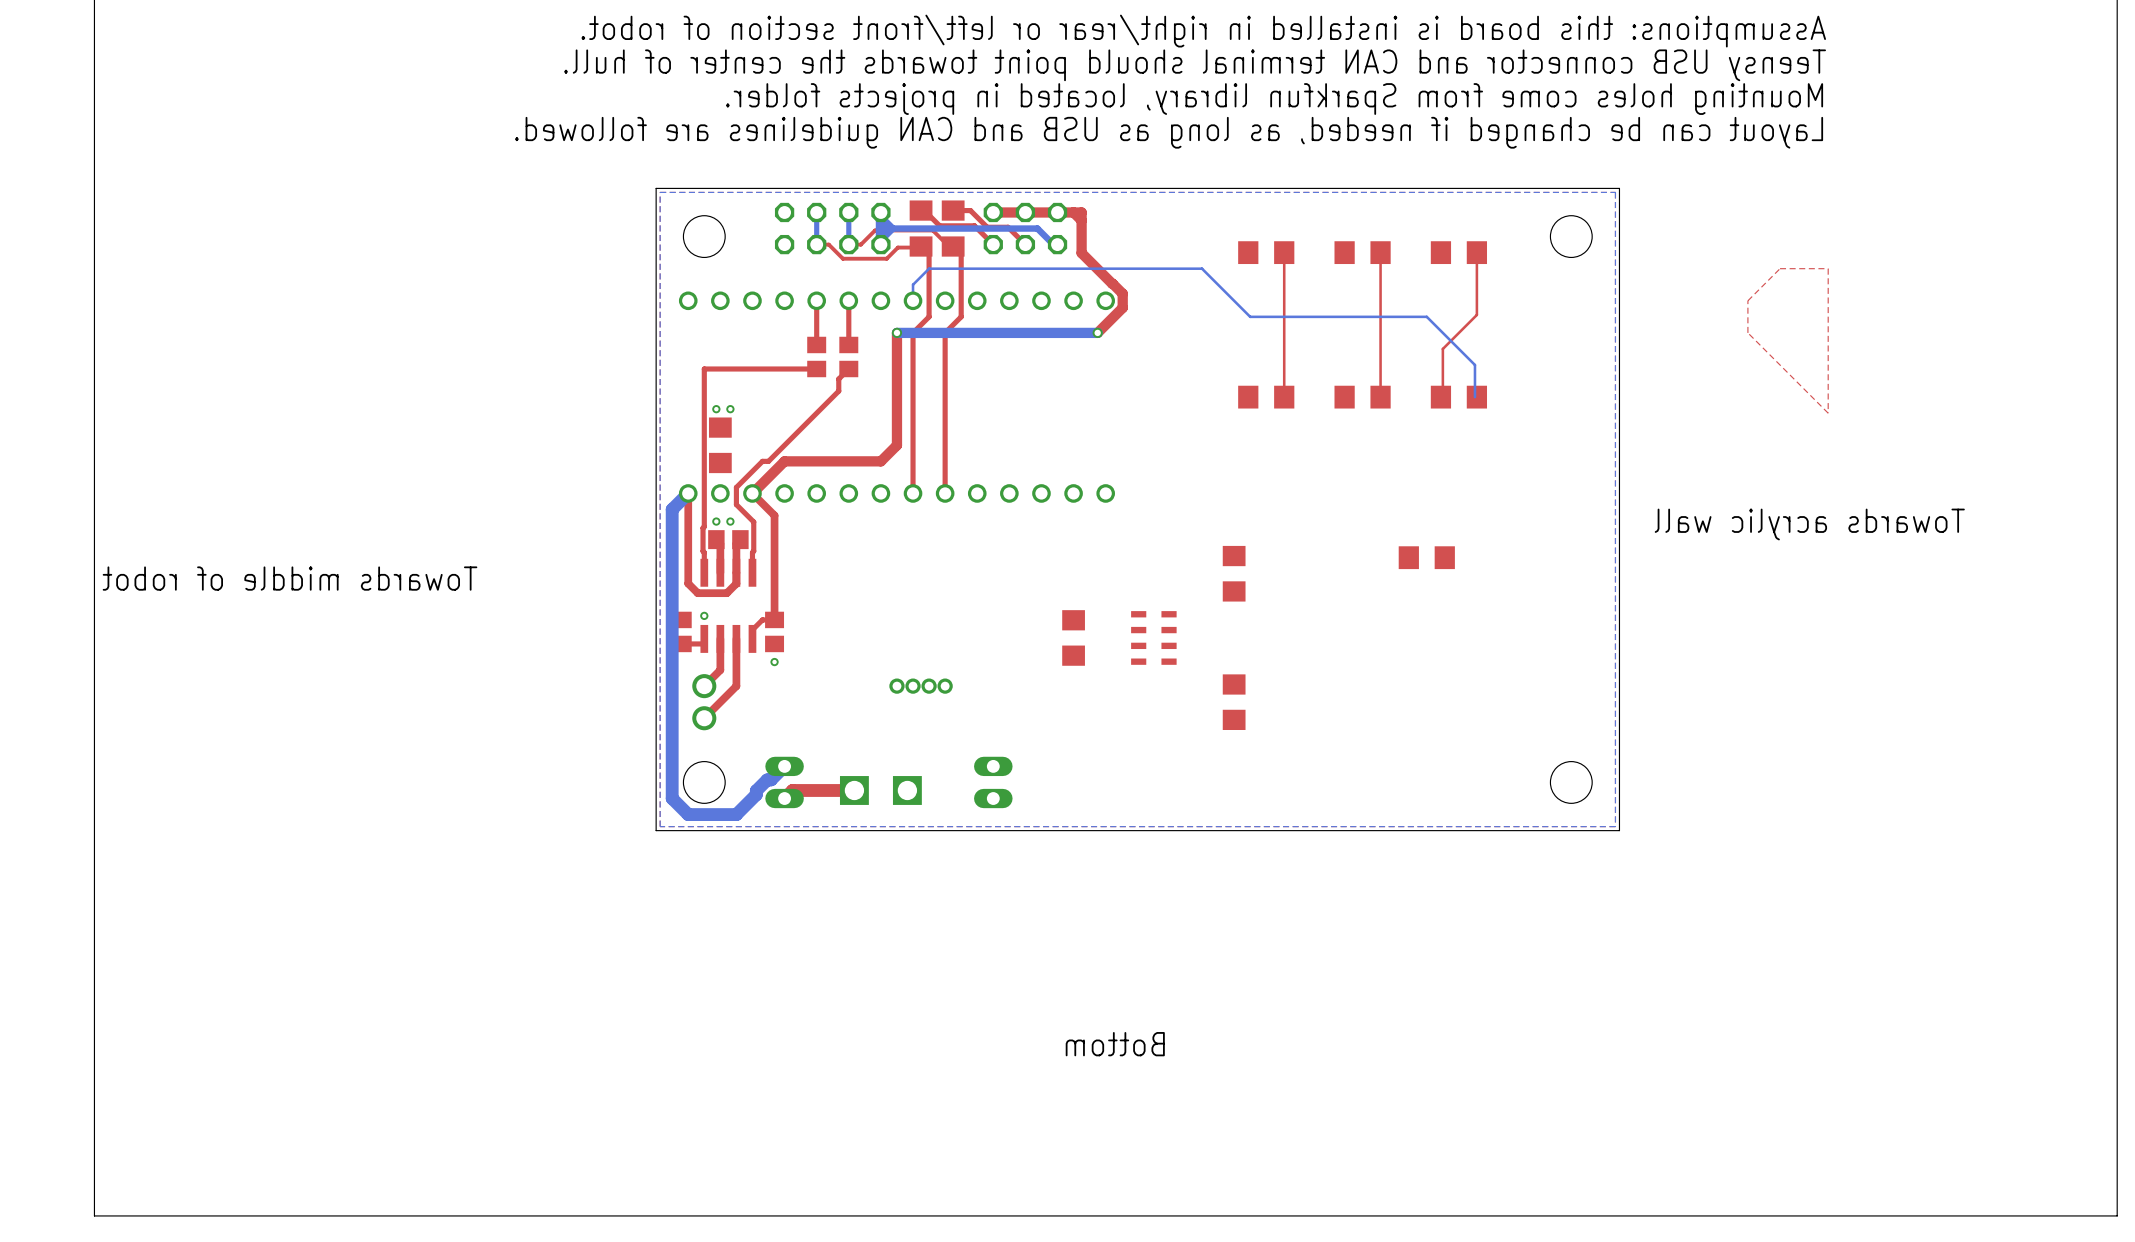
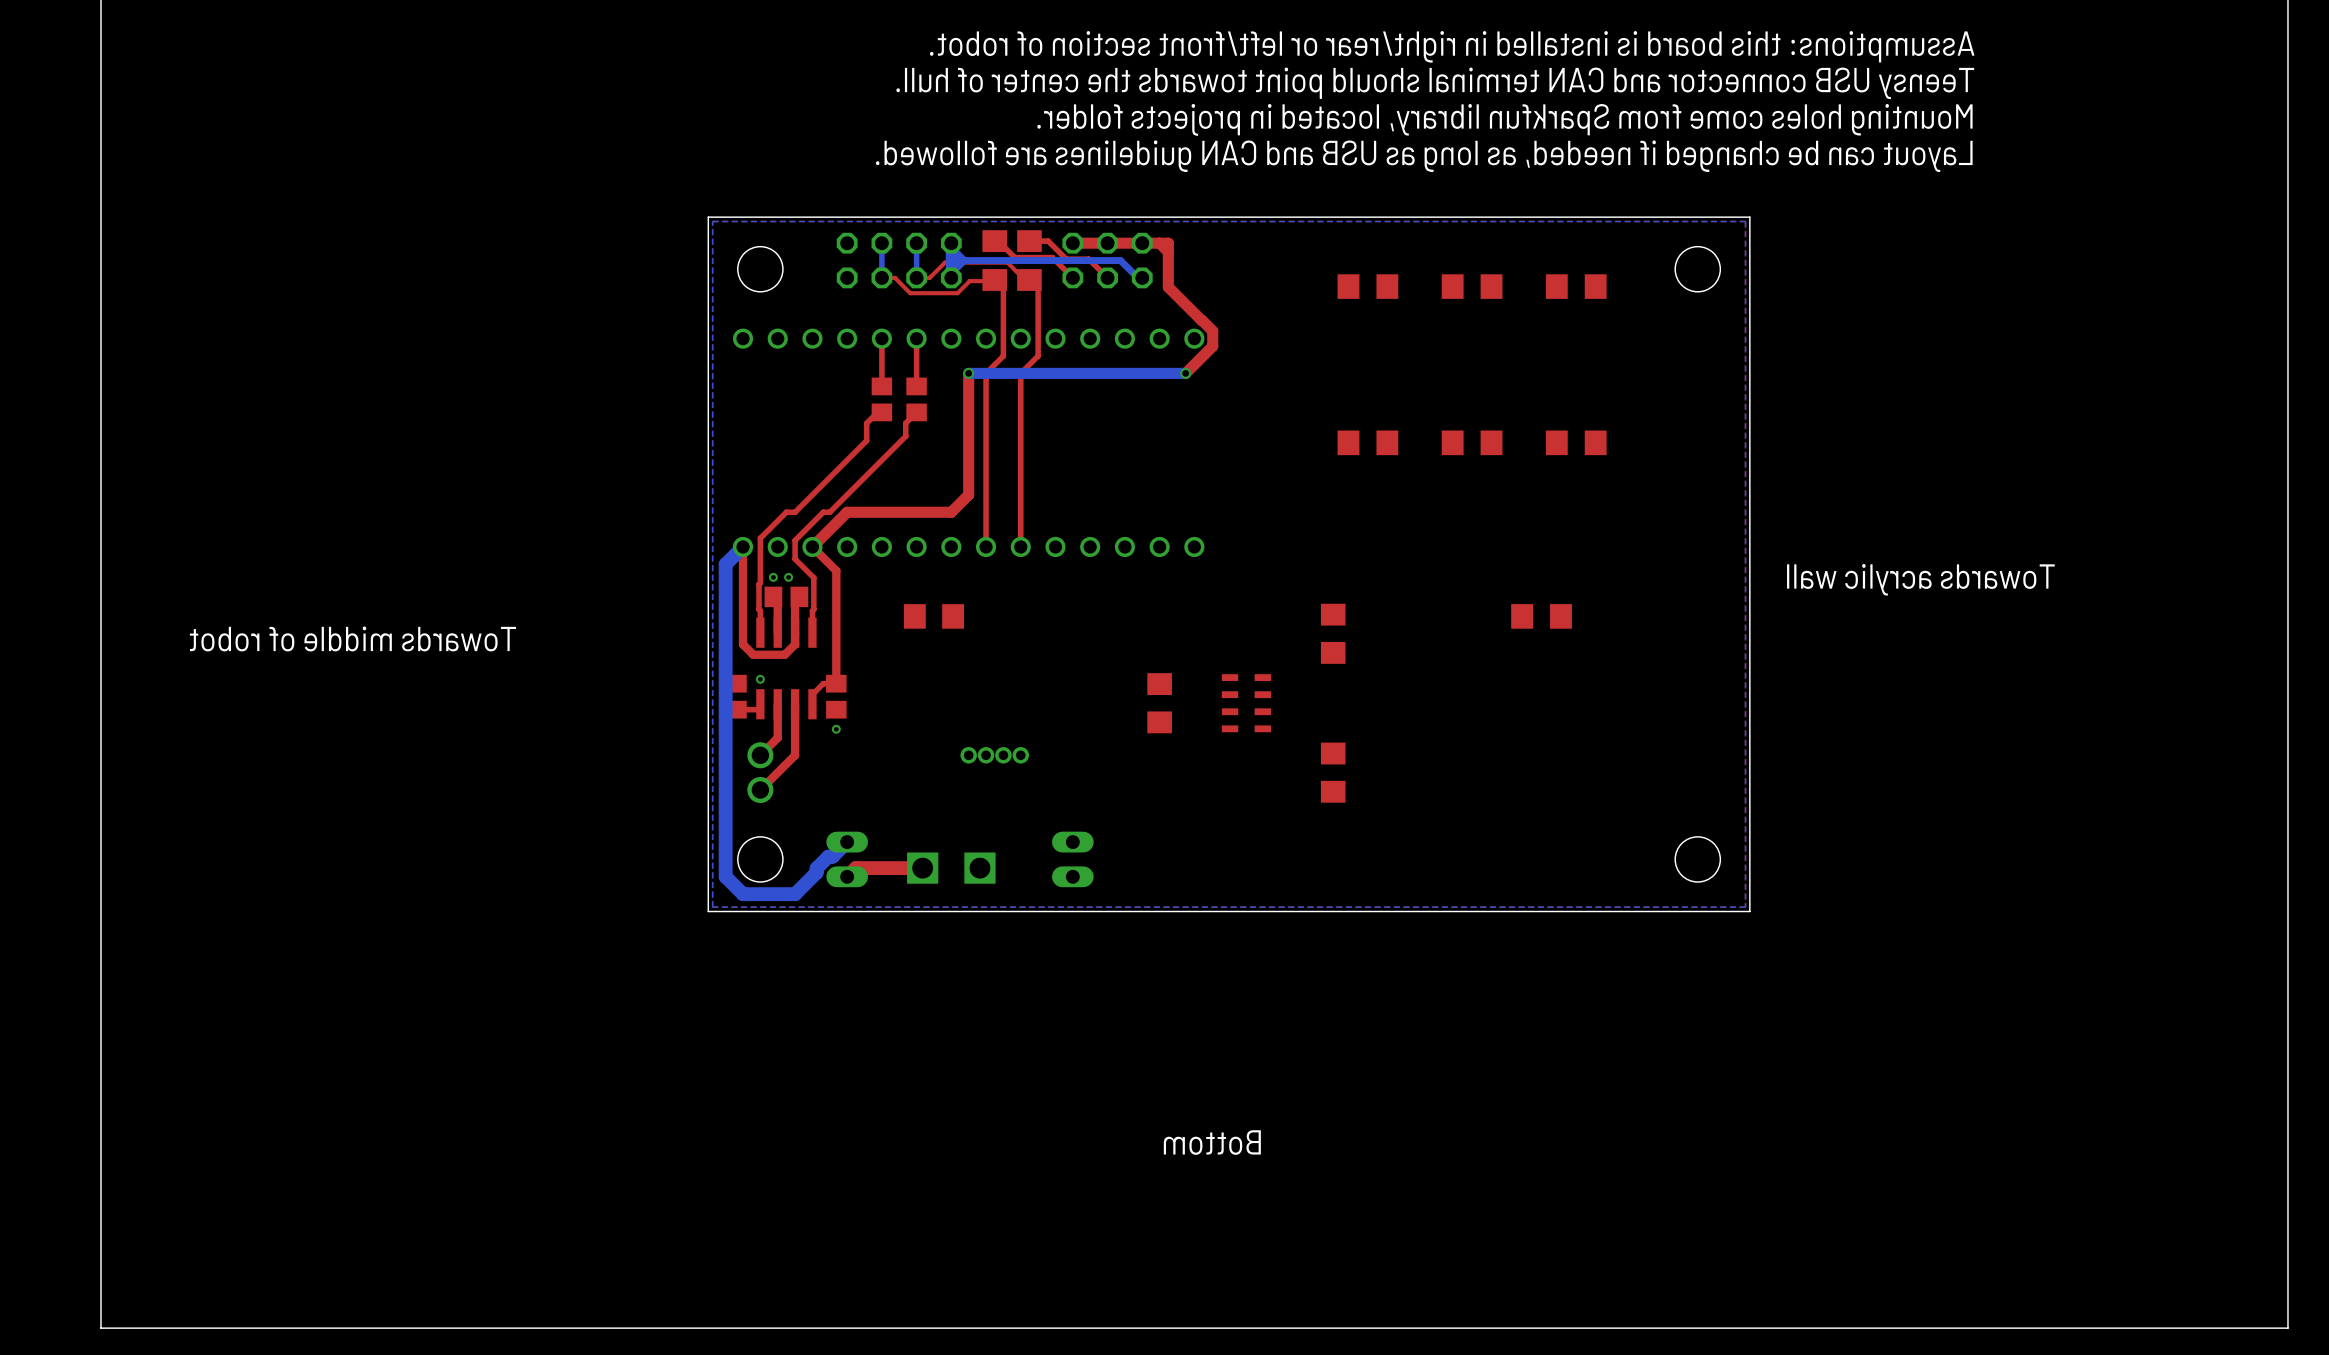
top track: (1284, 252) (1284, 397) -> none
top track: (1380, 252) (1380, 397) -> none
top track: (1476, 252) (1476, 314) (1442, 348) (1442, 395) (1440, 397) -> none
top zone outline: (1828, 268) (1828, 413) (1747, 332) (1747, 300) (1780, 268) (1828, 268) -> none
bottom track: (913, 300) (913, 284) (929, 268) (1202, 268) (1250, 316) (1426, 316) (1474, 365) (1474, 397) -> none
top track: (812, 369) (704, 369) (704, 485) -> (877, 412) (866, 423) (866, 440) (795, 512) (786, 512) (760, 538)
via: (716, 409) -> none
via: (730, 409) -> none
part rotation: 0° (720, 445) -> 90° clockwise (933, 616)
part position: (720, 445) -> (933, 616)

